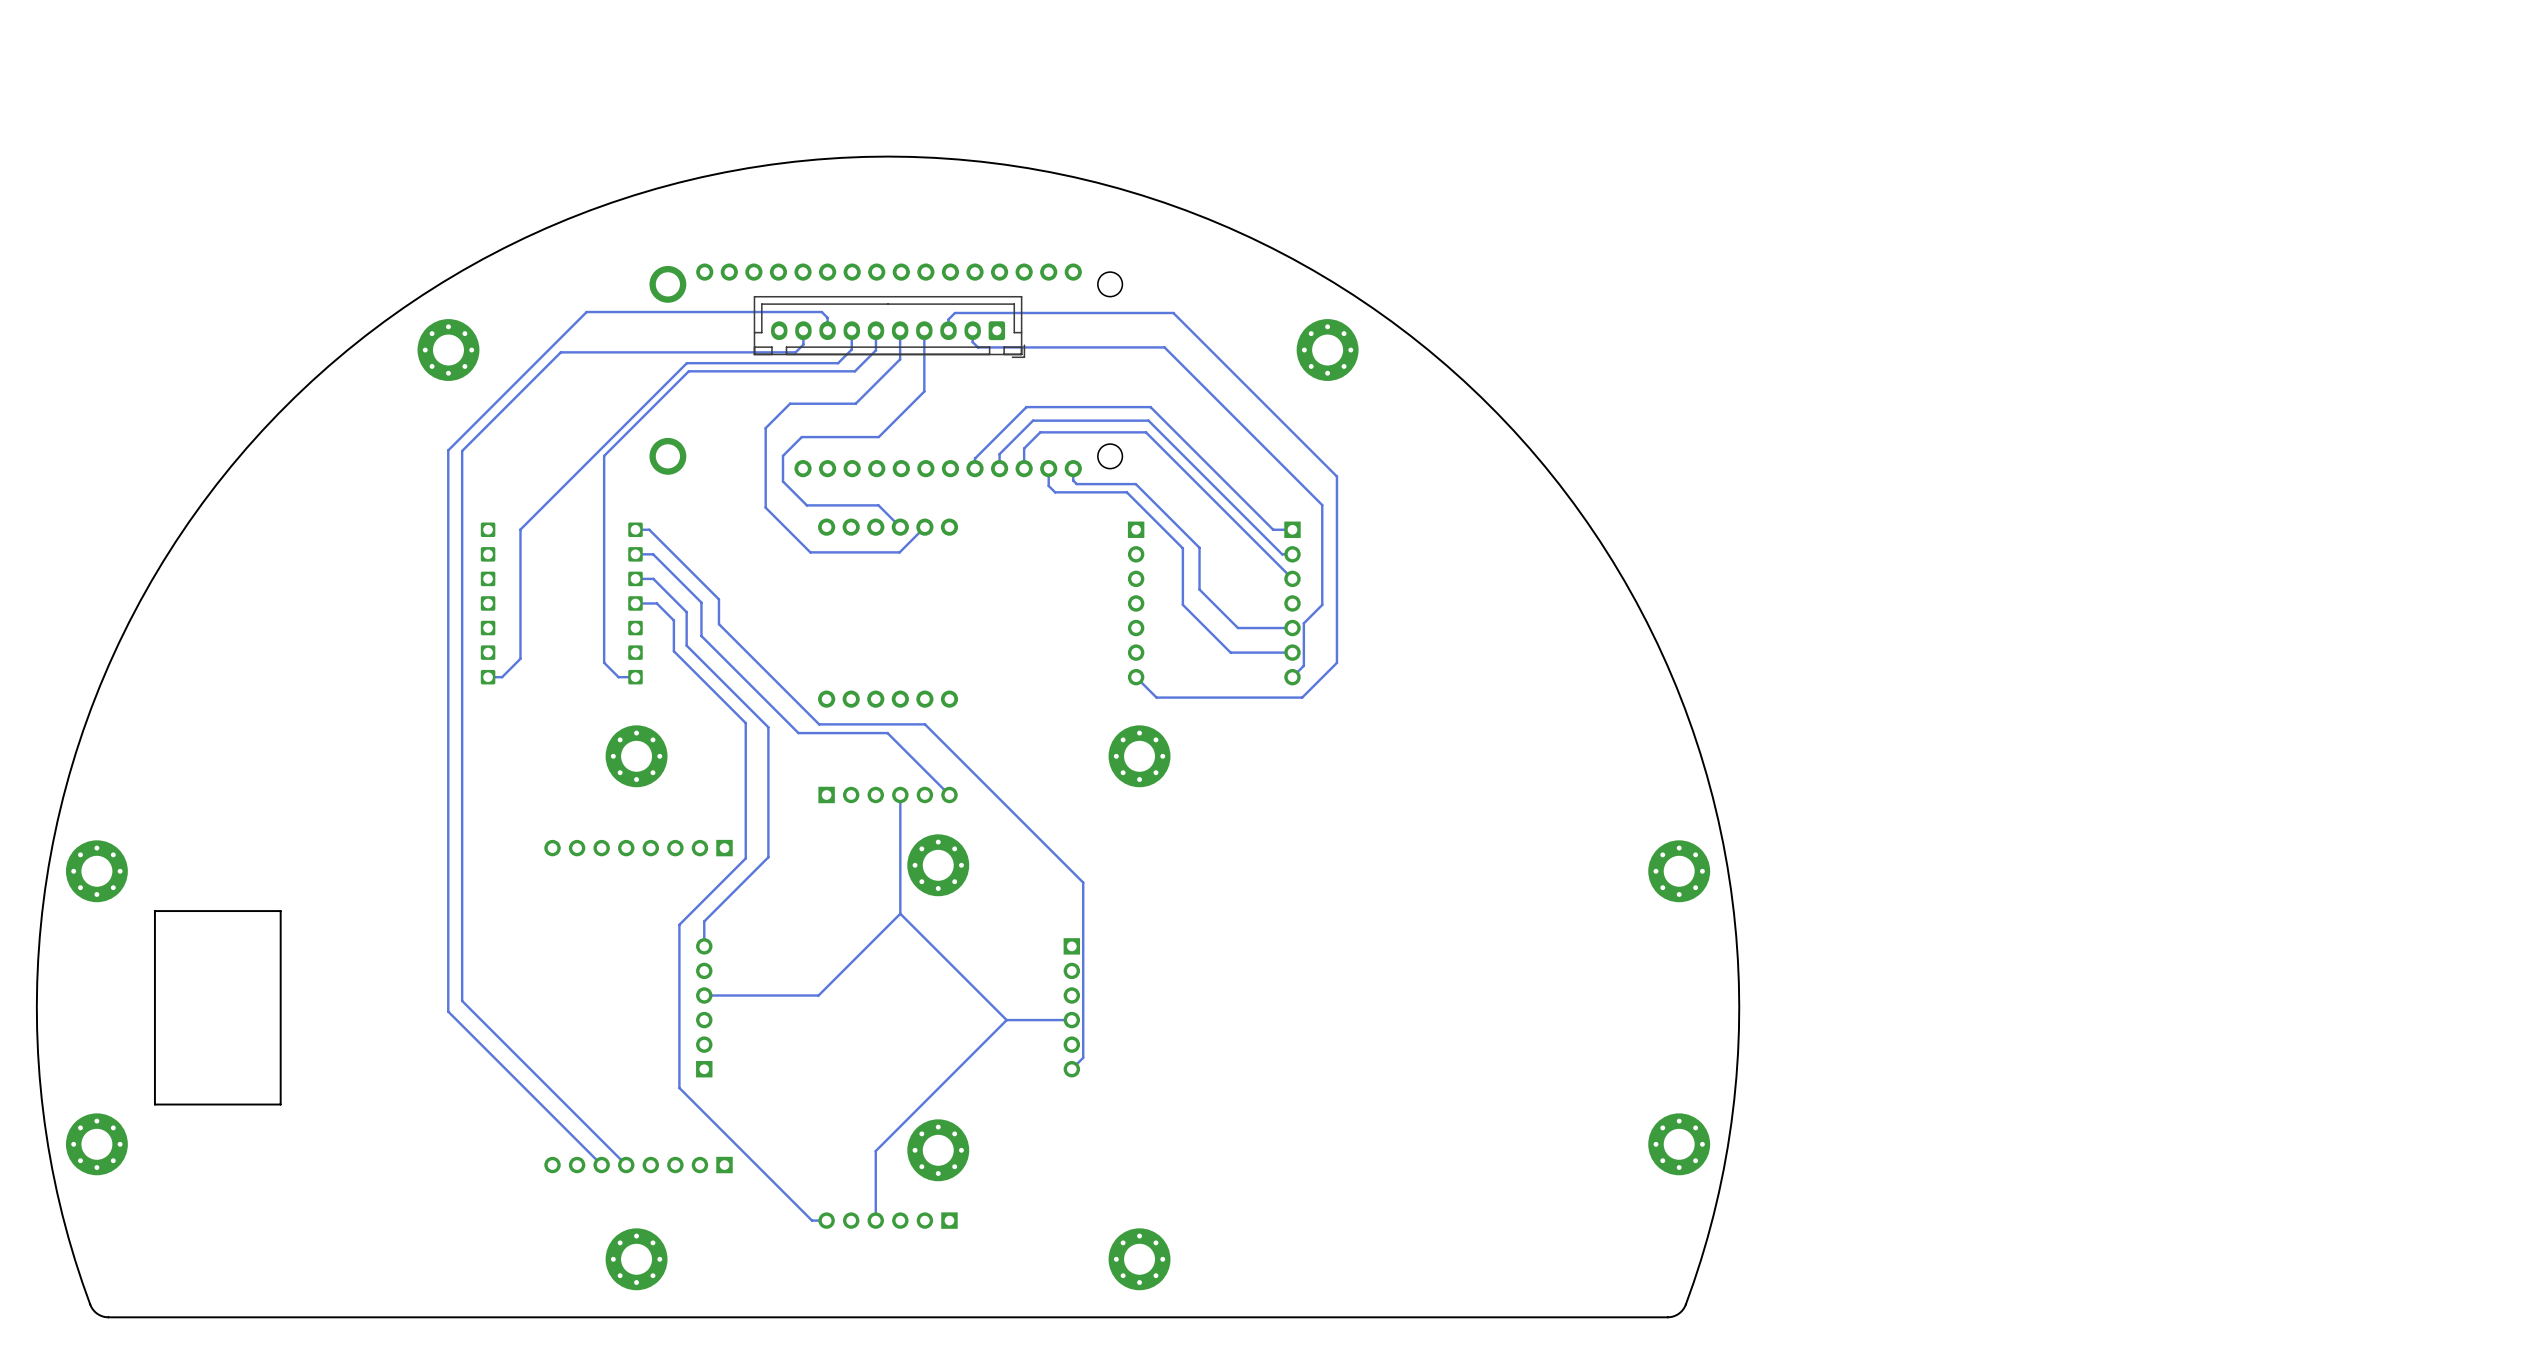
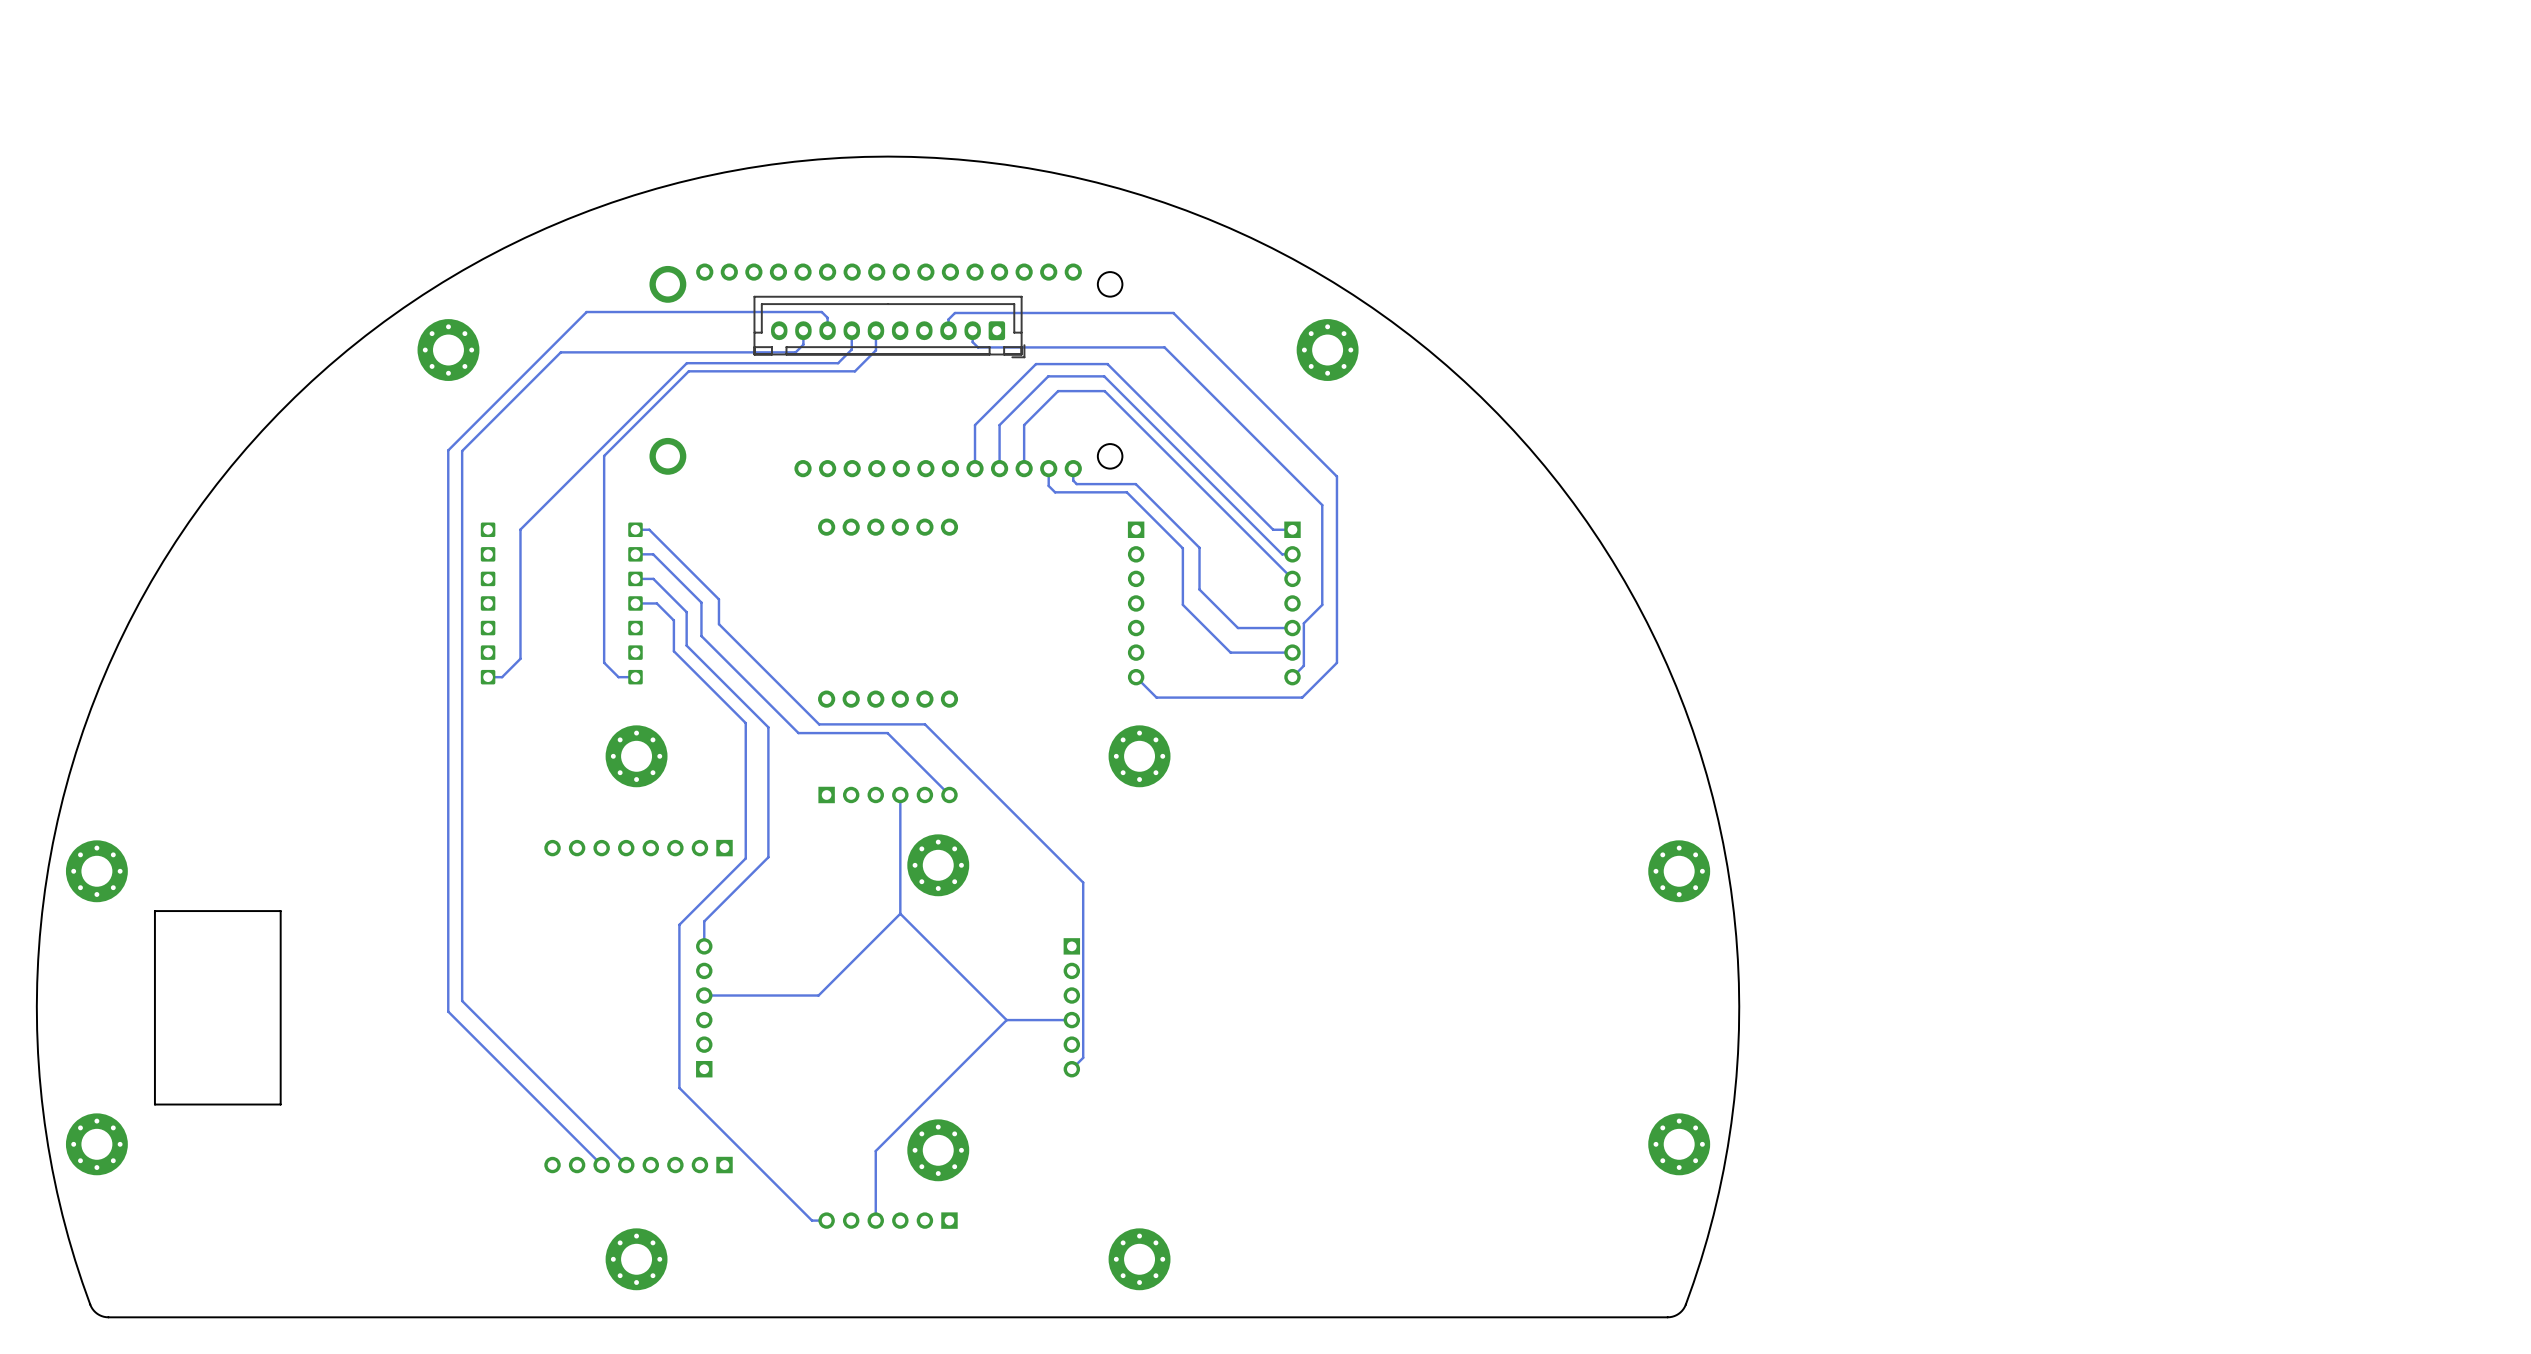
track: (900, 330) (900, 359) (855, 403) (790, 403) (765, 428) (765, 507) (810, 552) (899, 552) (924, 527) -> none
track: (924, 330) (924, 391) (878, 437) (801, 437) (783, 455) (783, 481) (806, 505) (878, 505) (900, 527) -> none
track: (1150, 407) (1026, 407) (975, 458) -> (1150, 407) (1107, 364) (1036, 364) (975, 425) (975, 458)
track: (1148, 420) (1033, 420) (999, 454) -> (1148, 420) (1104, 376) (1048, 376) (999, 425) (999, 454)
track: (1145, 432) (1040, 432) (1024, 448) -> (1145, 432) (1104, 391) (1058, 391) (1024, 425) (1024, 448)

